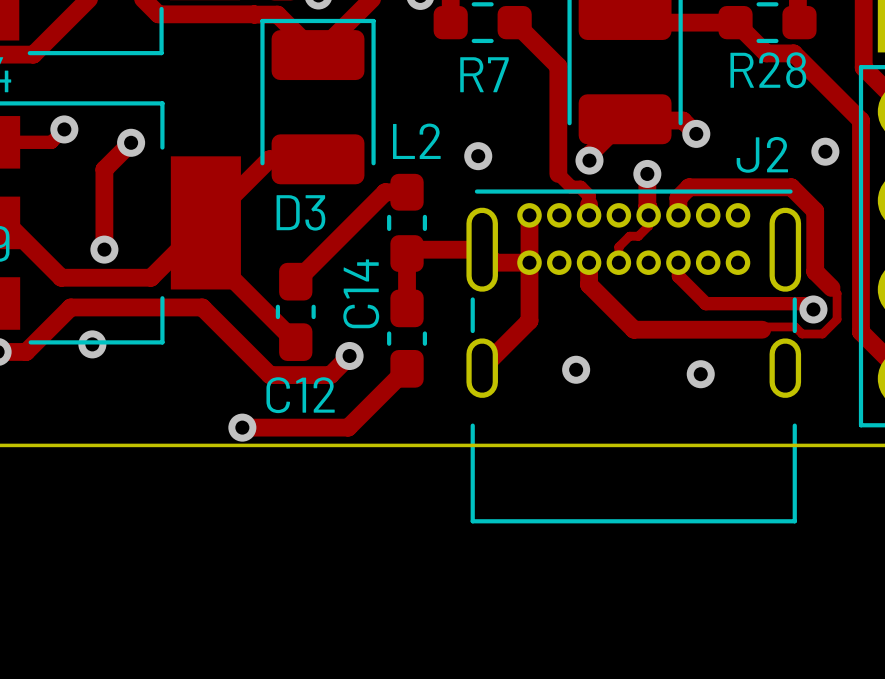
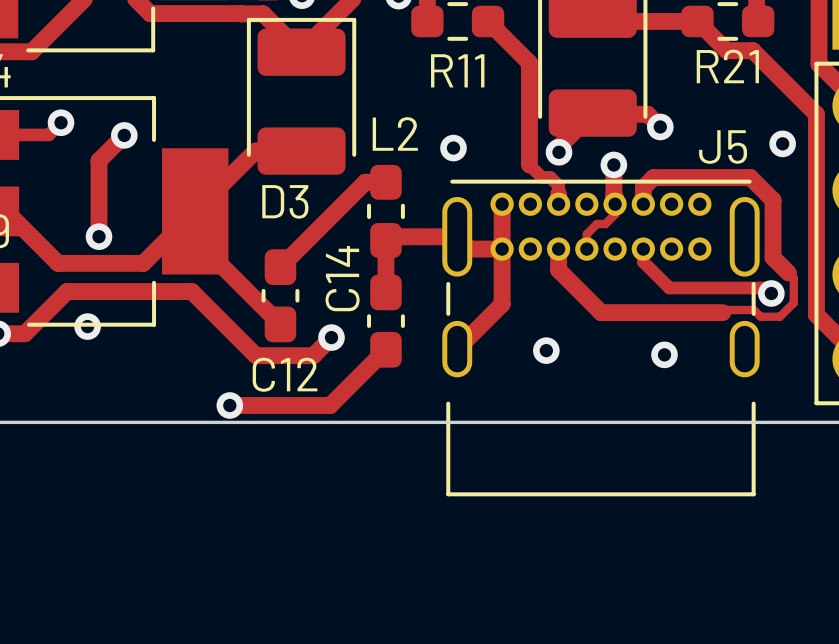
R28 name: R28 (768, 70) -> R21 (727, 66)
R7 name: R7 (484, 74) -> R11 (457, 70)
J2 name: J2 (762, 154) -> J5 (723, 147)

